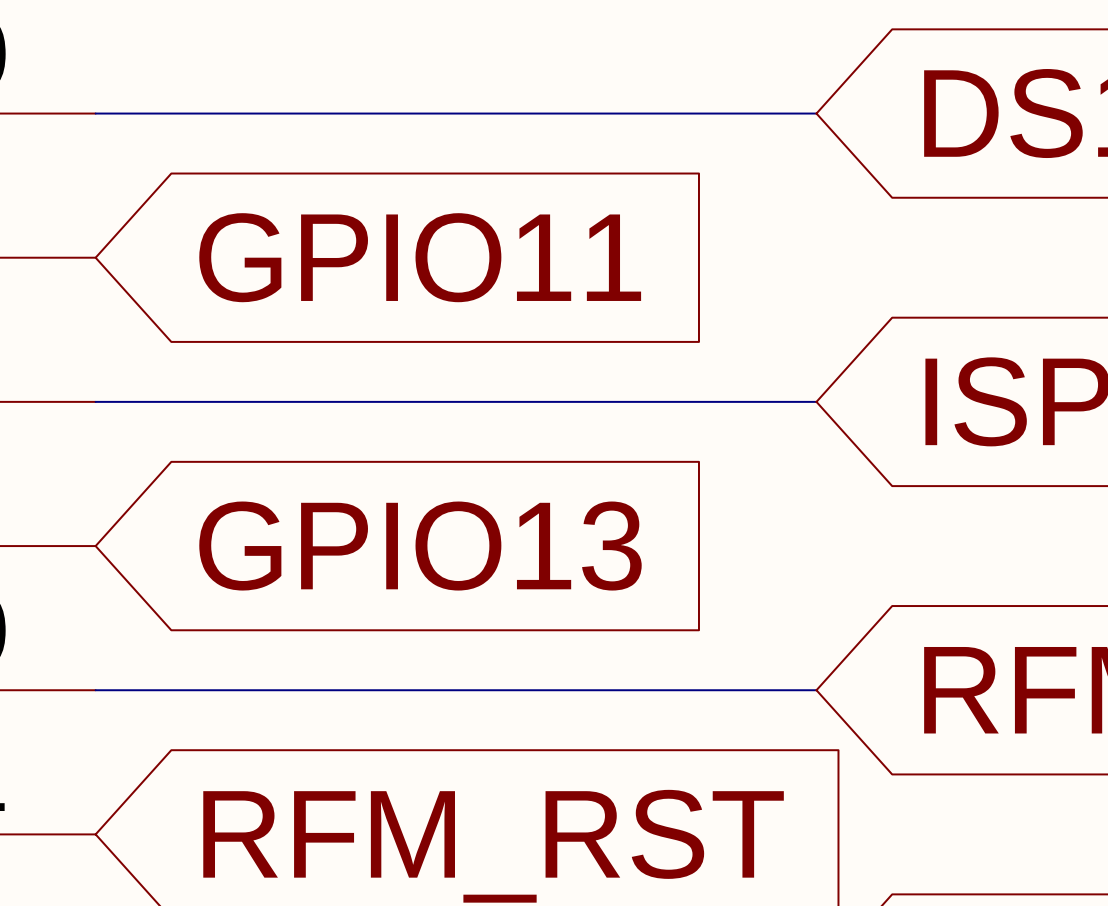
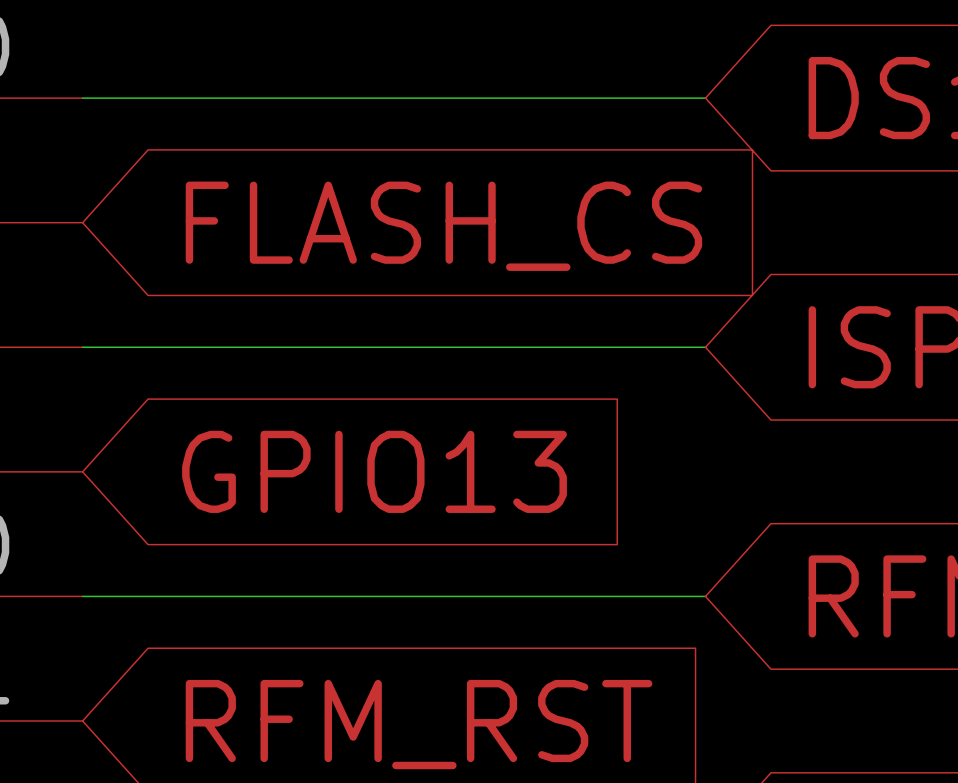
global label: GPIO11 (420, 257) -> FLASH_CS (443, 226)

